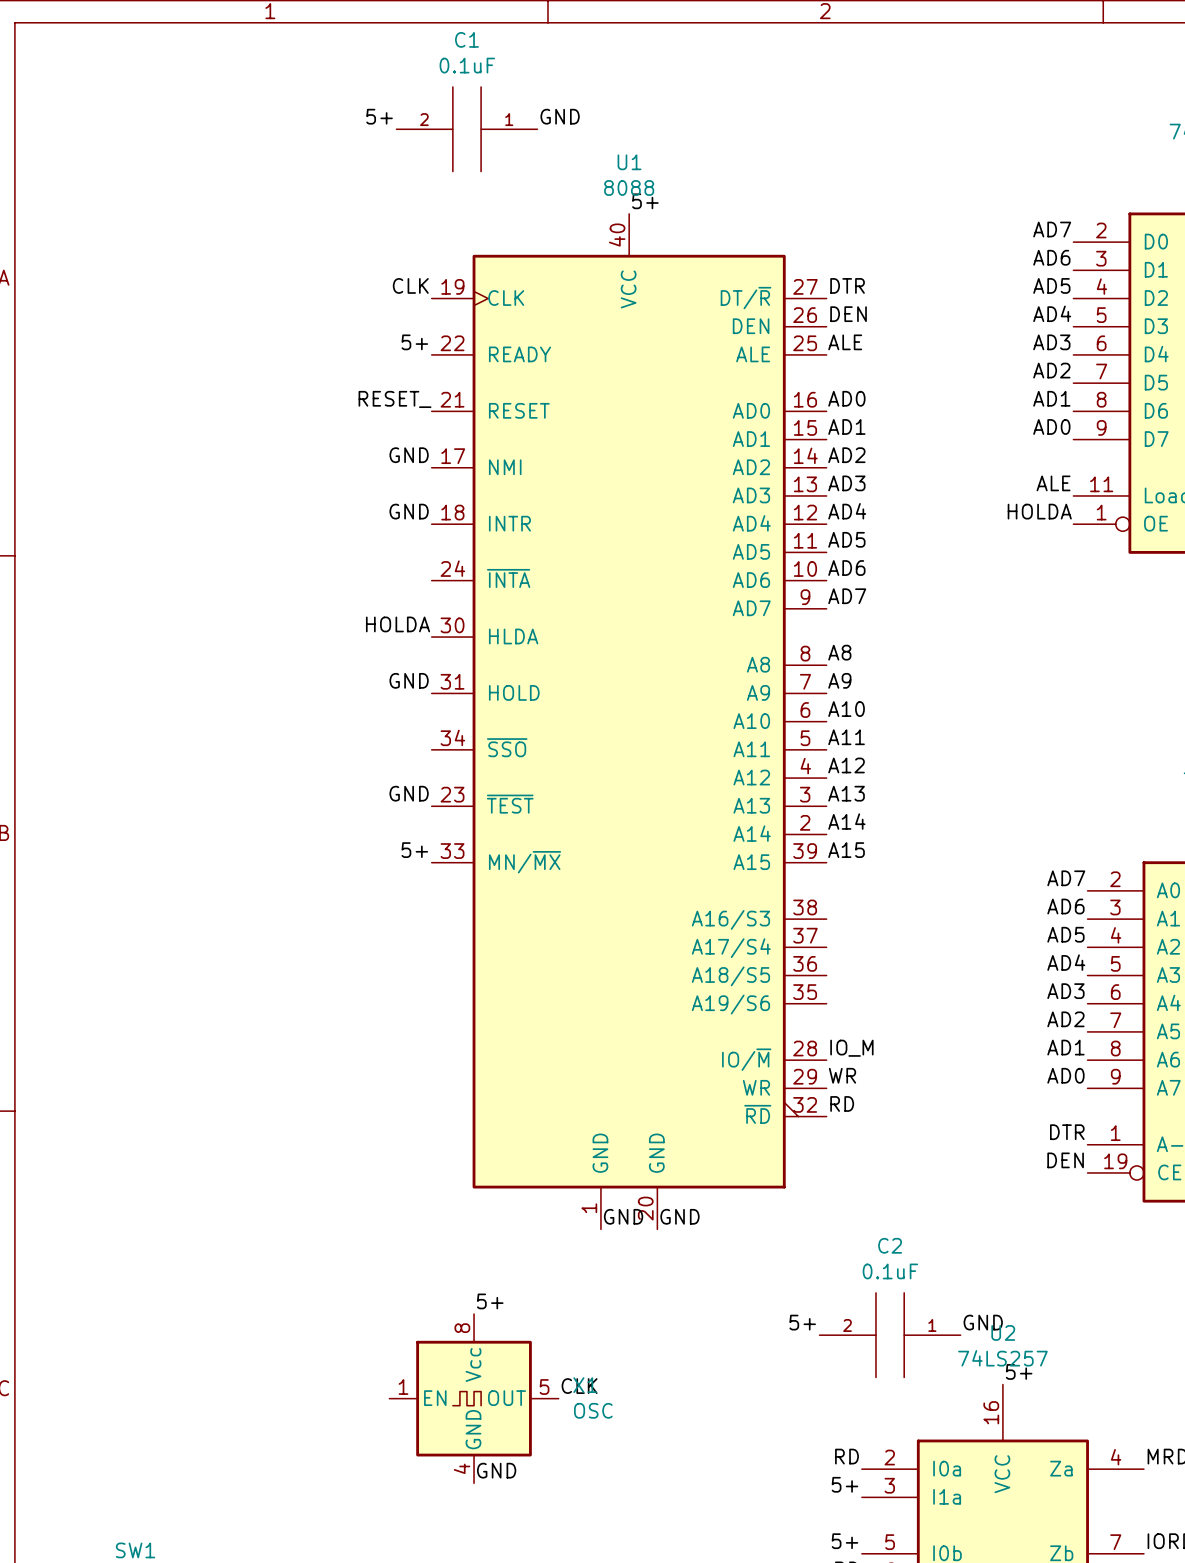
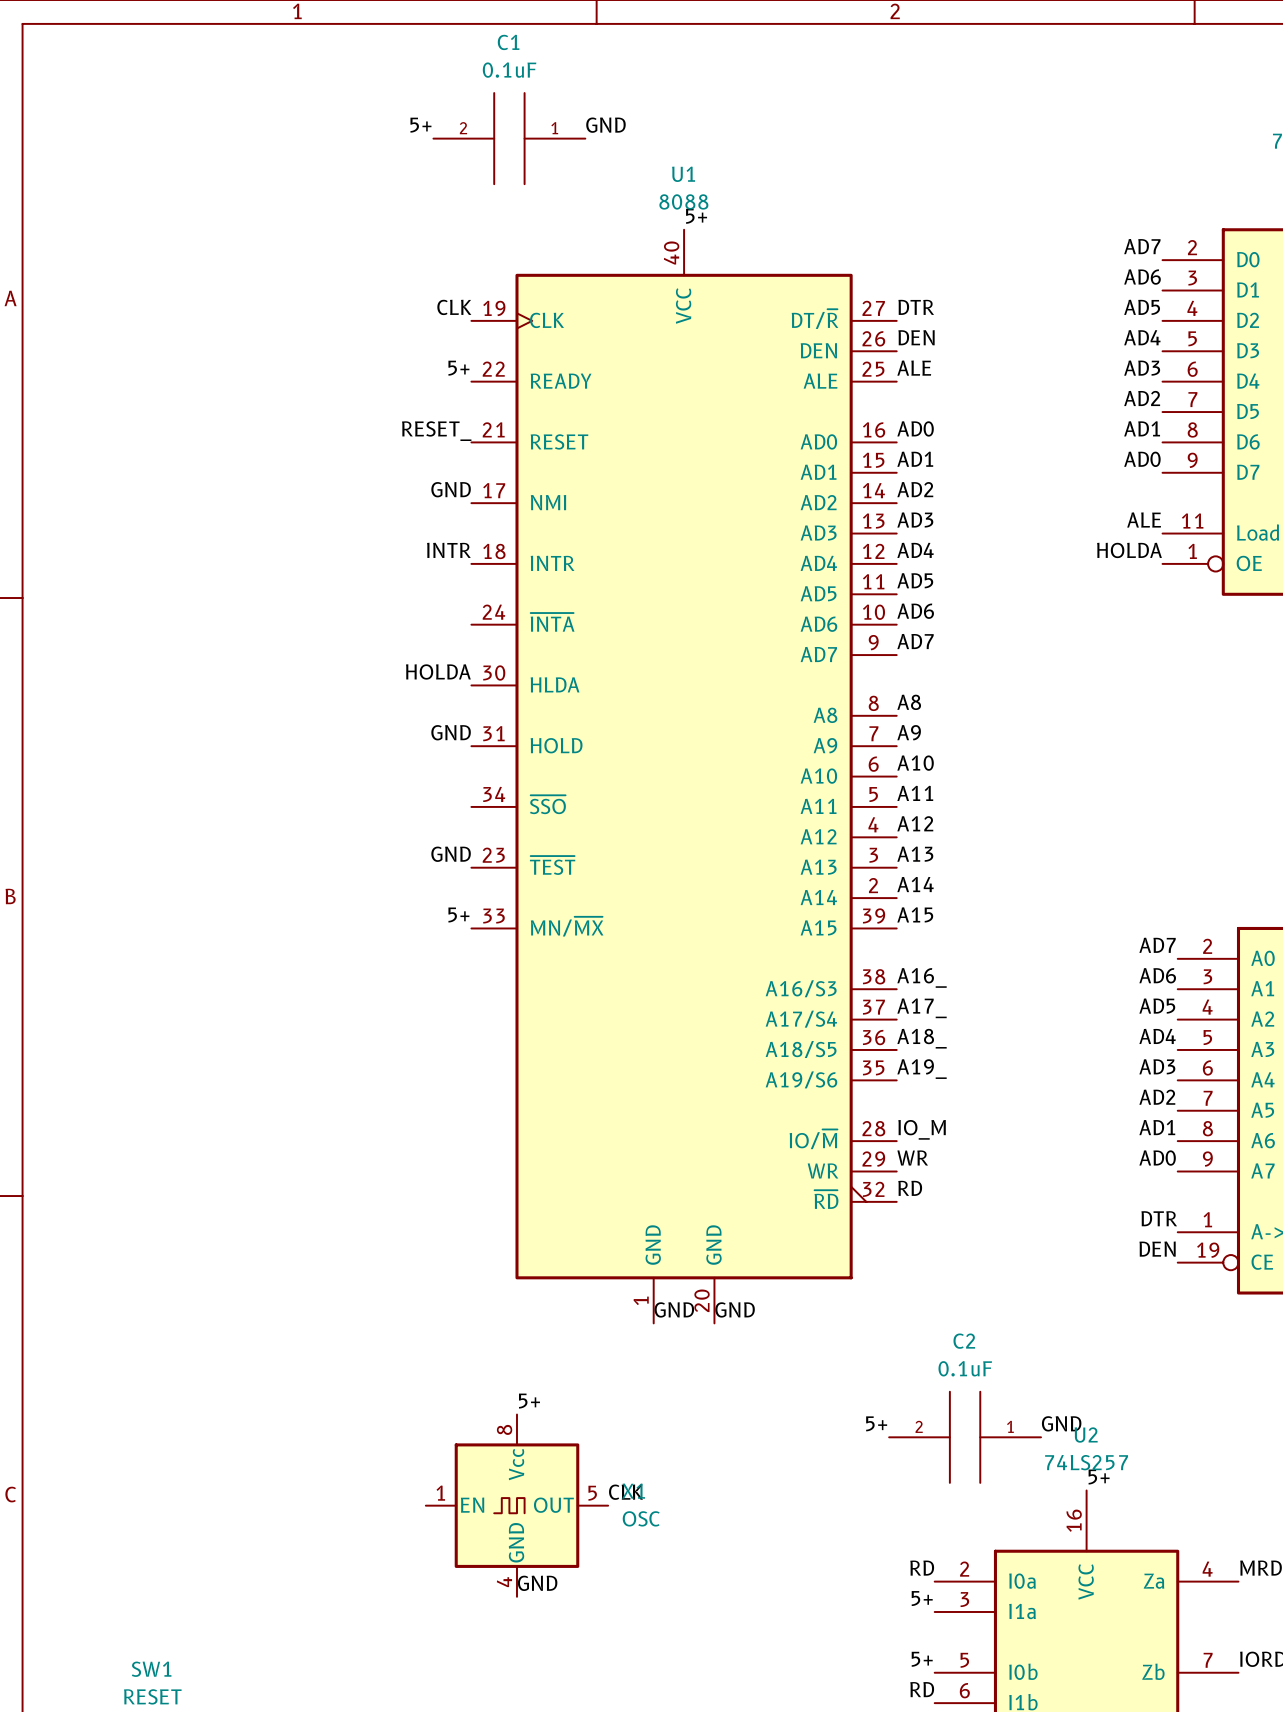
label: GND (409, 511) -> INTR (448, 550)
label: none -> A16_ (922, 977)
label: none -> A17_ (922, 1008)
label: none -> A18_ (922, 1038)
label: none -> A19_ (922, 1069)

